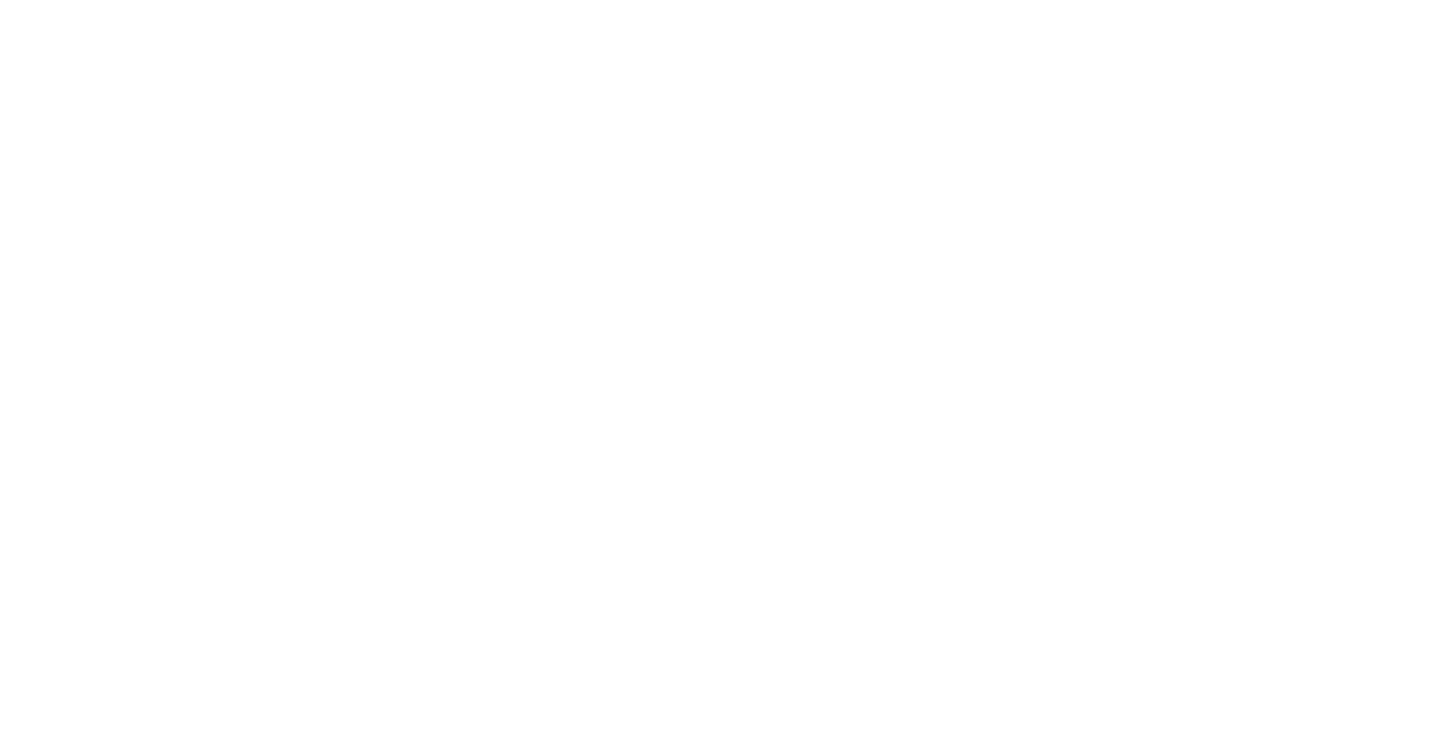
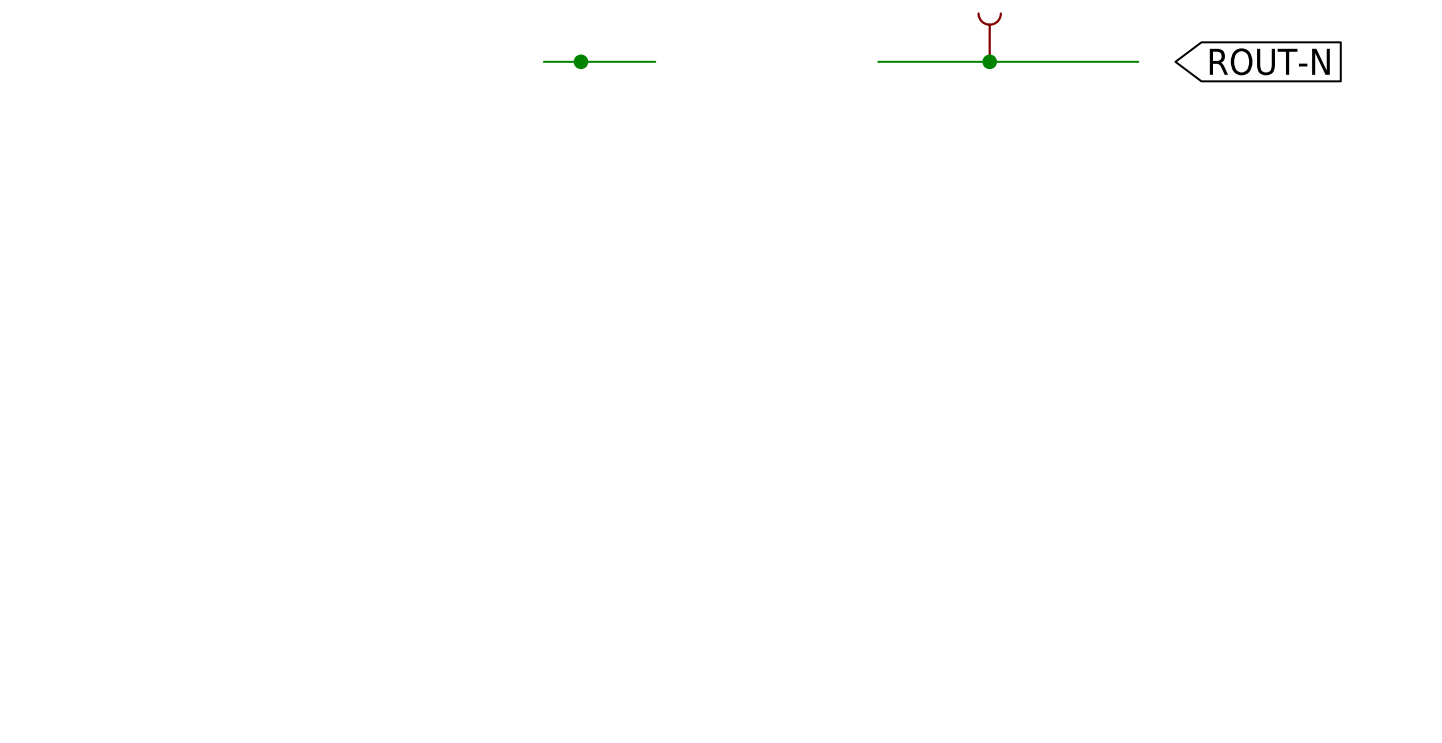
part: none -> (989, 37)
wire: none -> (543, 61) (655, 61)
junction: none -> (580, 61)
wire: none -> (878, 61) (1138, 61)
junction: none -> (989, 61)
global label: none -> ROUT-N (1269, 61)

